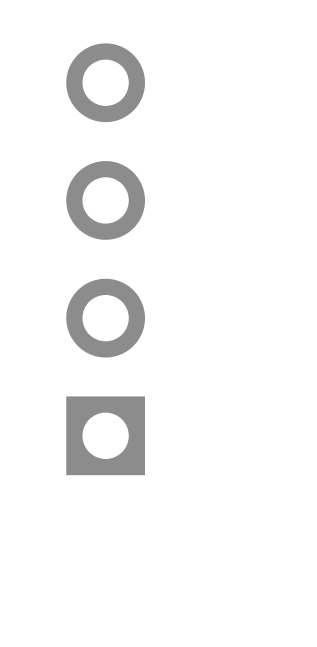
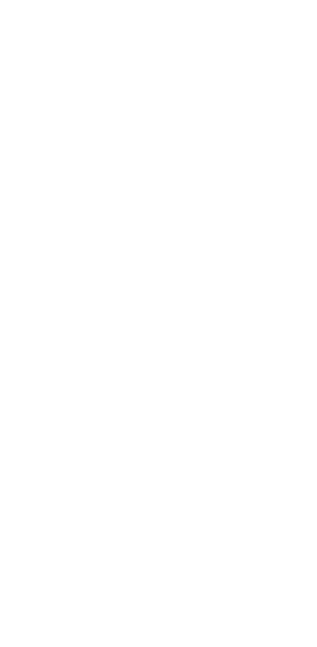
part: (105, 259) -> none

